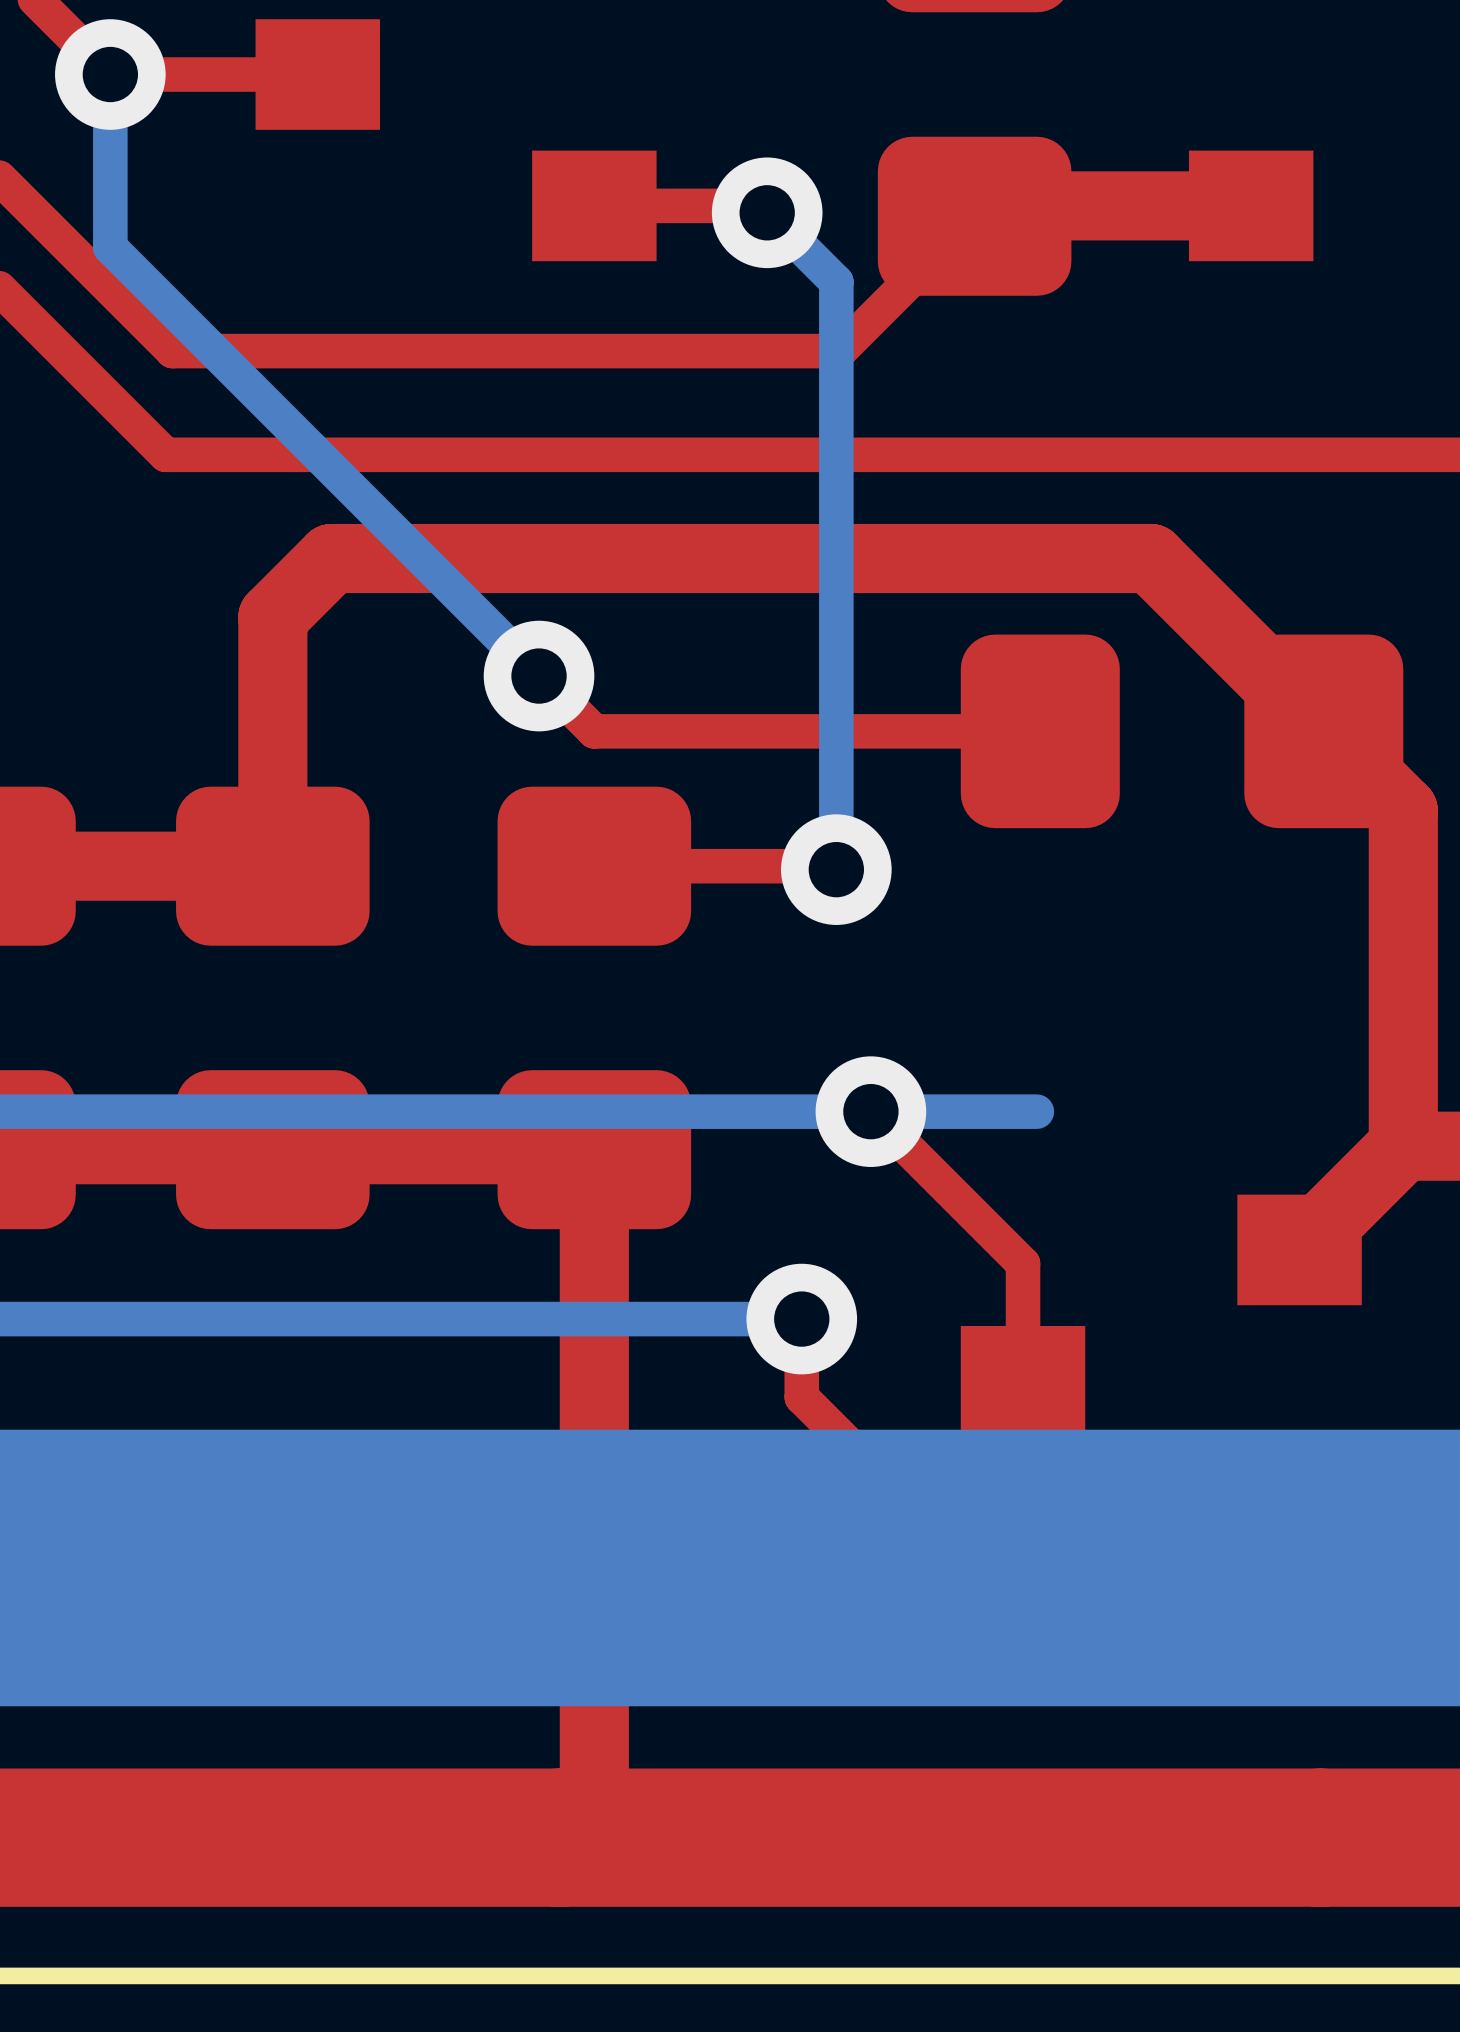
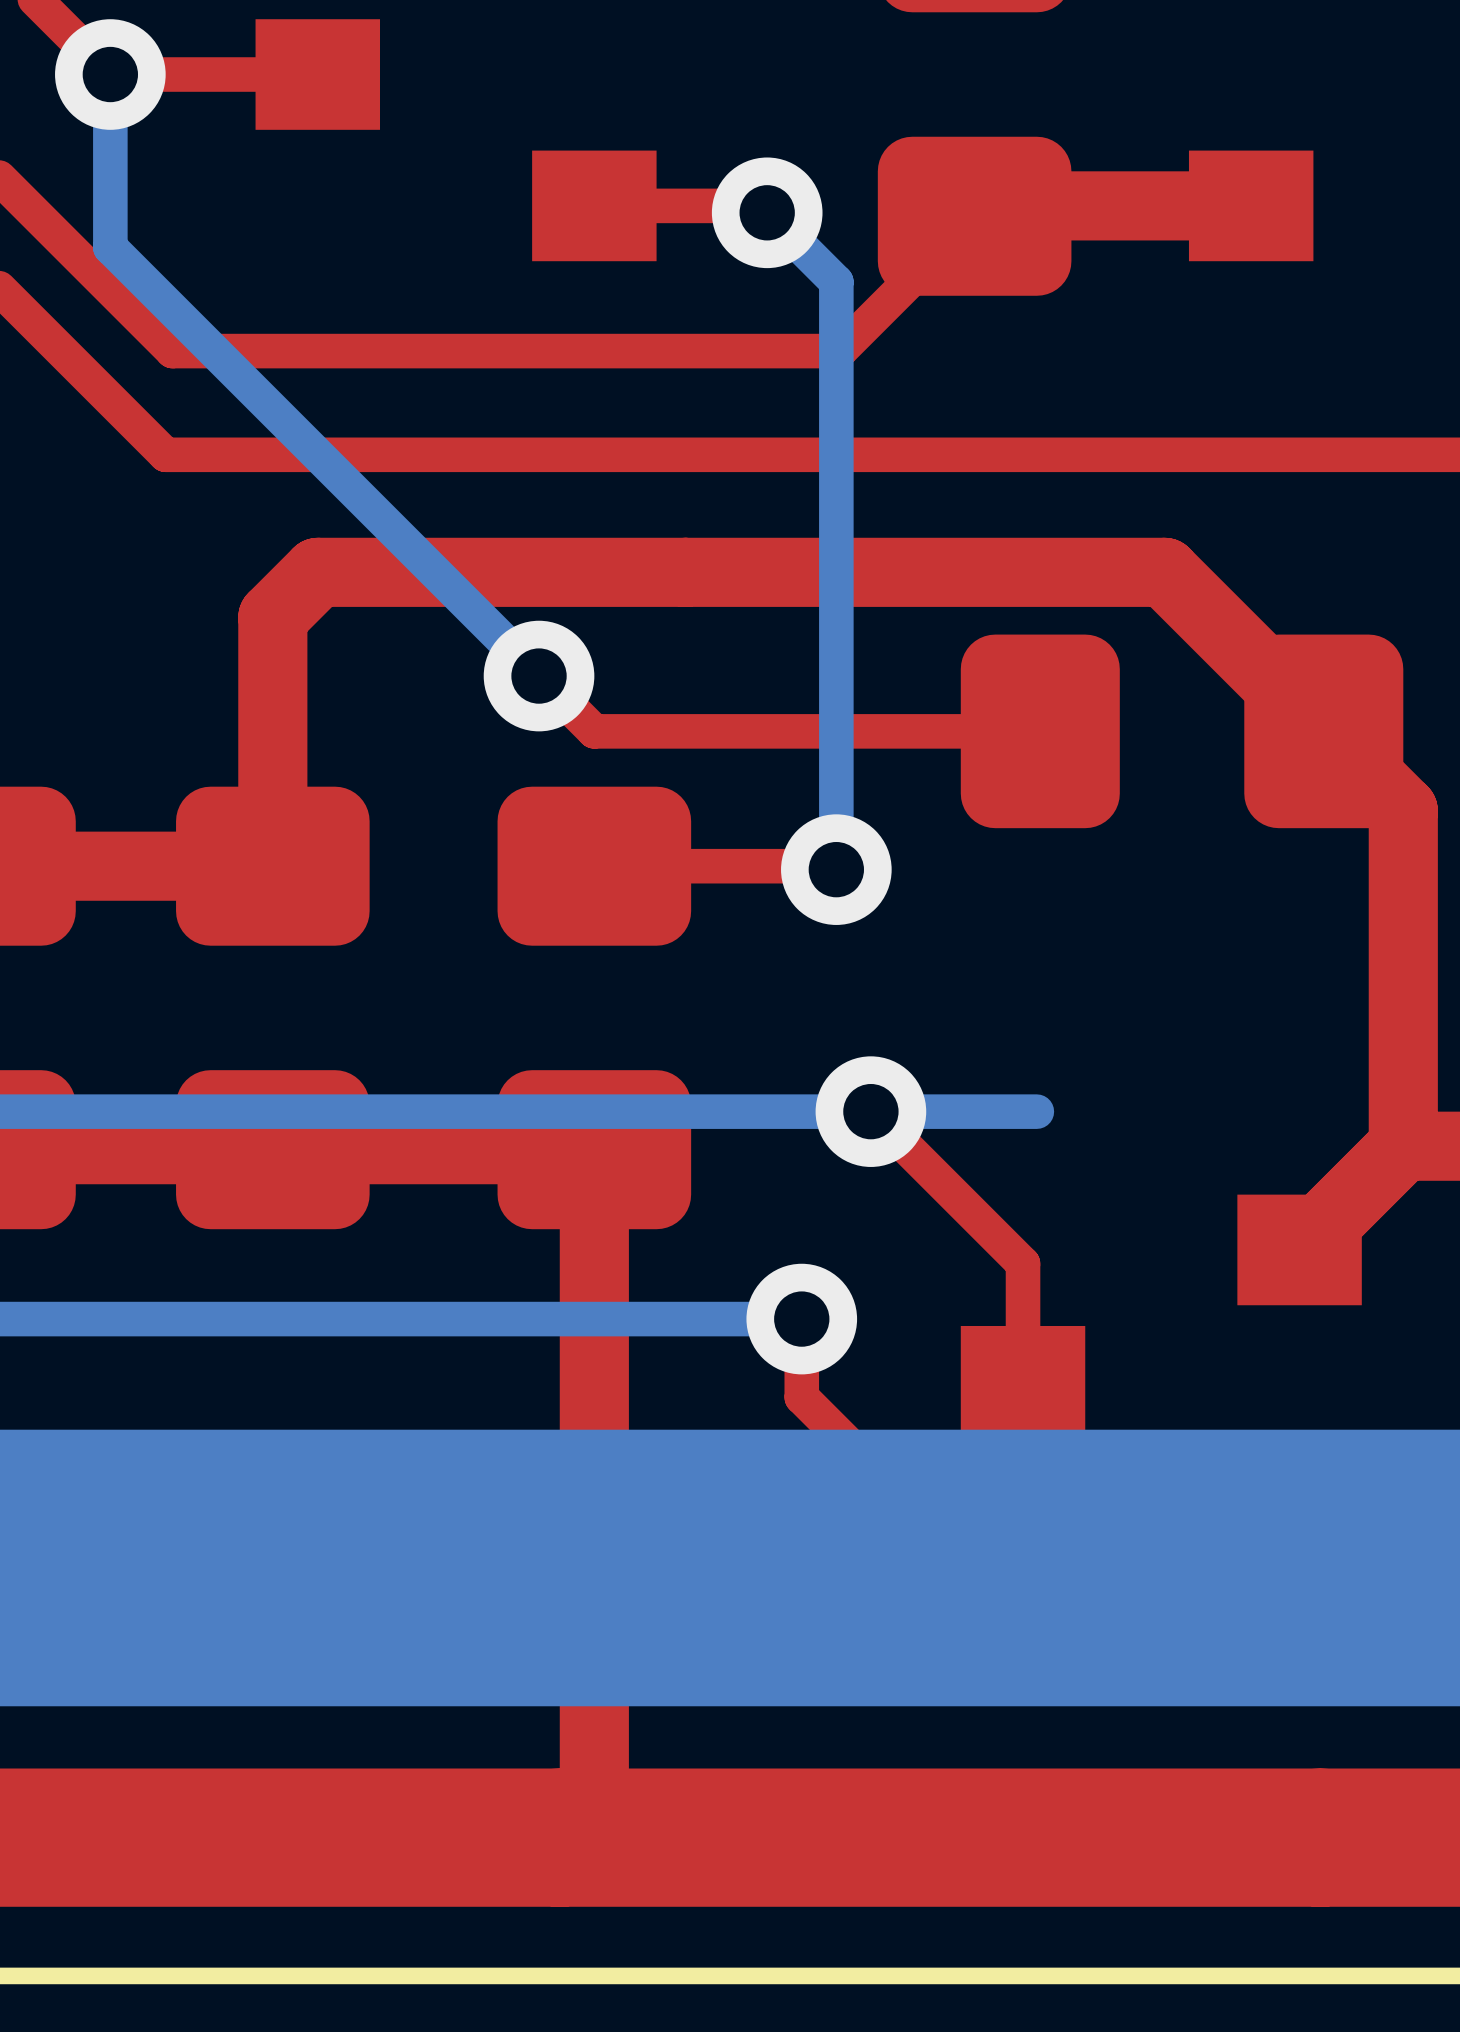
top track: (1164, 572) (1150, 558) (331, 558) (317, 572) -> (1164, 572) (317, 572)

